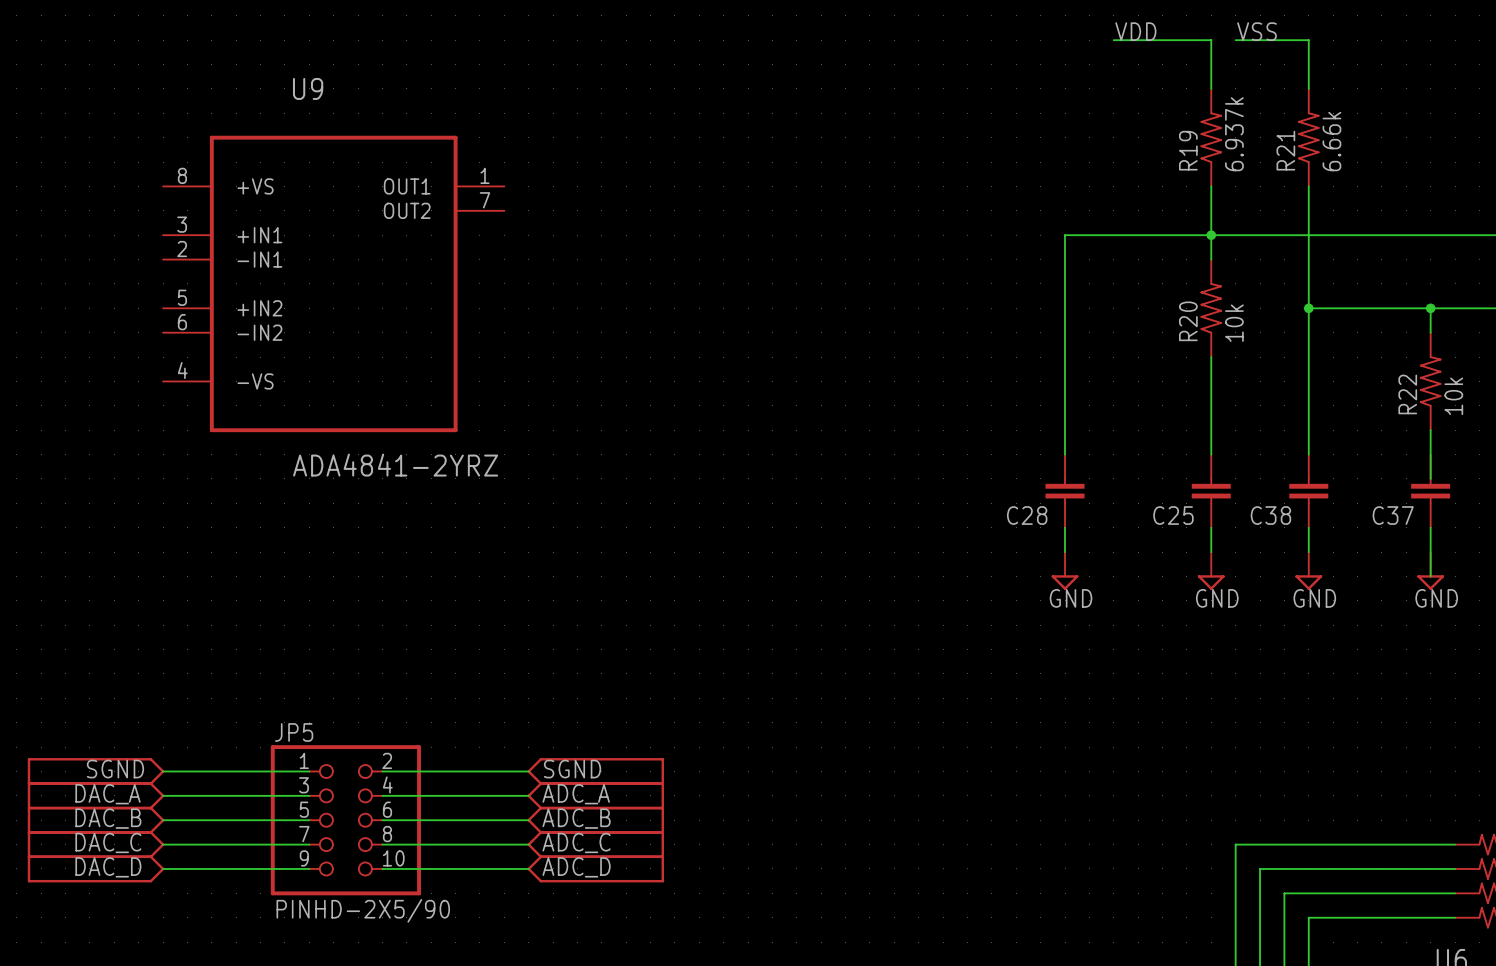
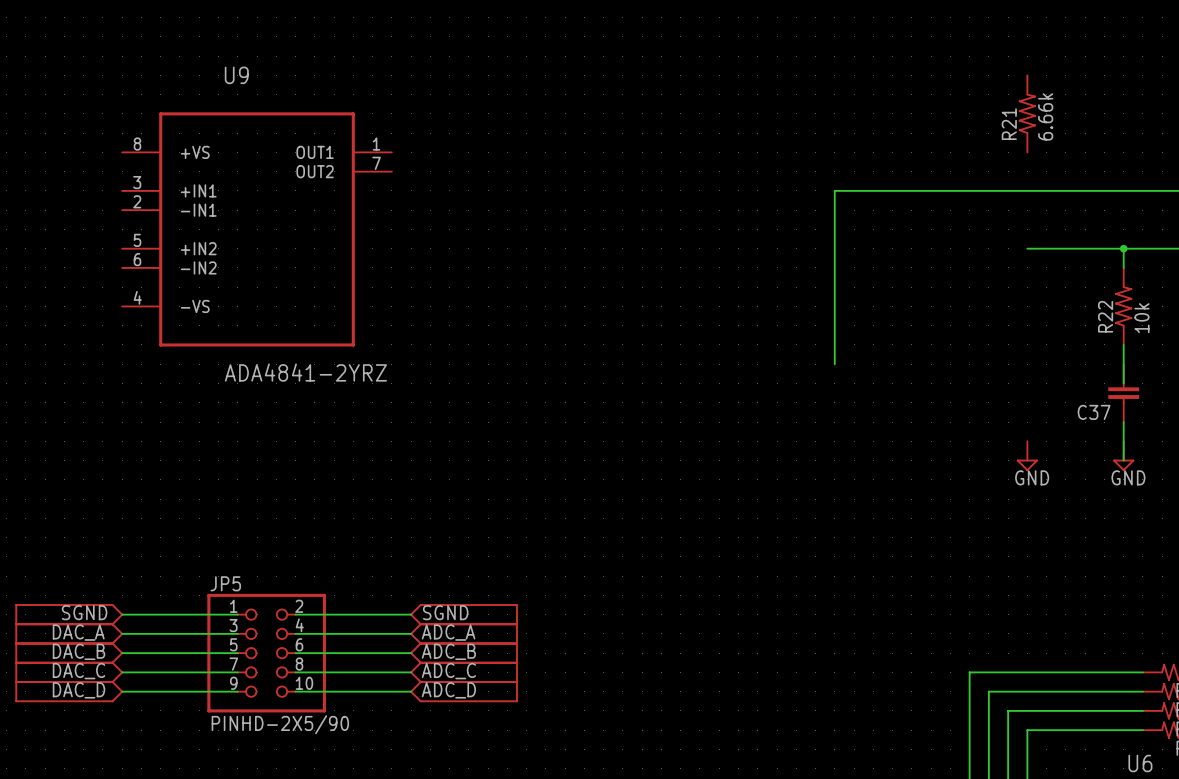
label: VDD (1135, 31) -> none
label: VSS (1257, 31) -> none
wire: (1113, 40) (1211, 40) (1211, 88) -> none
wire: (1235, 40) (1308, 40) (1308, 88) -> none
R19: 6.937k (1211, 137) -> none
wire: (1211, 186) (1211, 259) -> none
wire: (1308, 186) (1308, 454) -> none
junction: (1211, 235) -> none
R20: 10k (1211, 308) -> none
junction: (1308, 308) -> none
wire: (1211, 357) (1211, 454) -> none
C28: (1065, 491) -> none
C25: (1211, 491) -> none
C38: (1308, 491) -> none
wire: (1065, 527) (1065, 552) -> none
wire: (1211, 527) (1211, 552) -> none
wire: (1308, 527) (1308, 552) -> none
power symbol: GND (1065, 570) -> none
power symbol: GND (1211, 570) -> none

